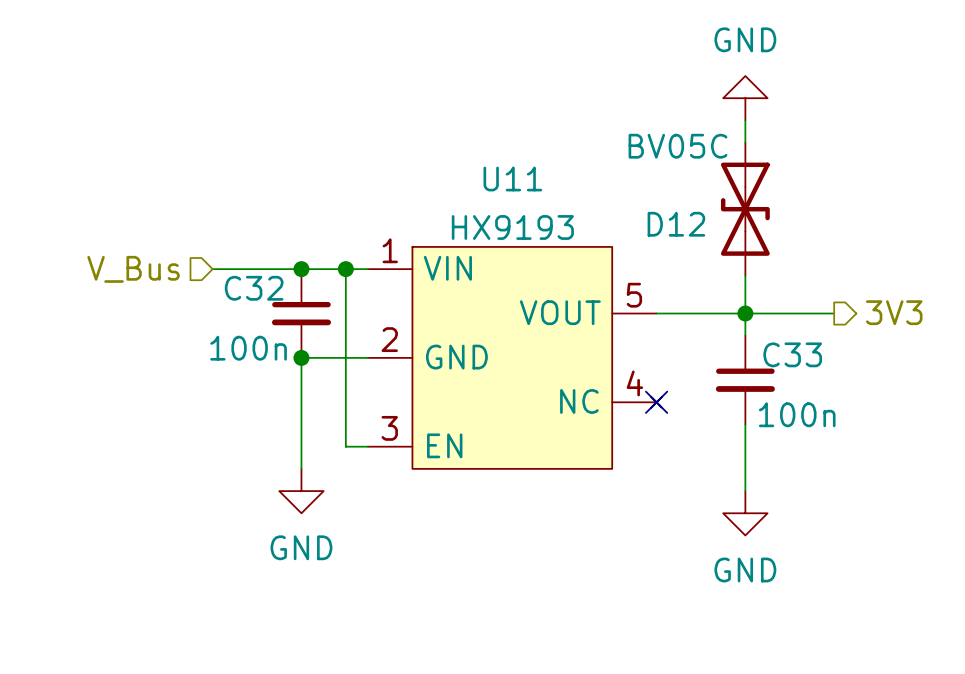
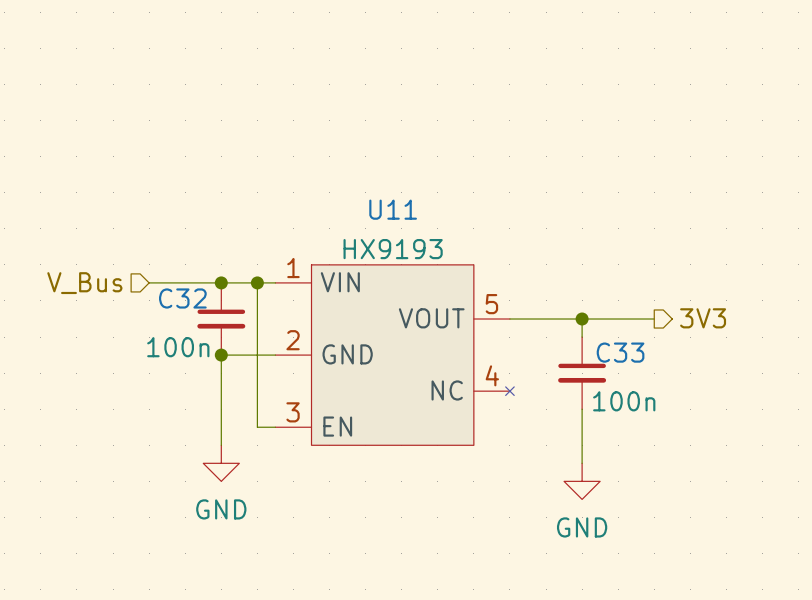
power symbol: GND (745, 98) -> none
wire: (745, 120) (745, 142) -> none
D12: BV05C (745, 209) -> none
wire: (745, 275) (745, 313) -> none
no-connect mark: (656, 402) -> none

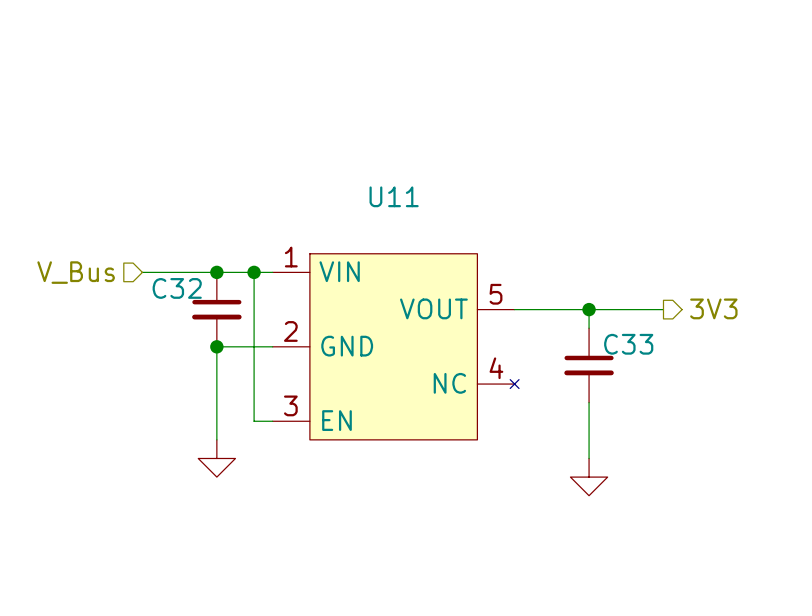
U11 value: HX9193 (393, 249) -> none
C32 value: 100n (178, 347) -> none
C33 value: 100n (624, 401) -> none
power symbol text: GND (221, 509) -> none
power symbol text: GND (582, 527) -> none

